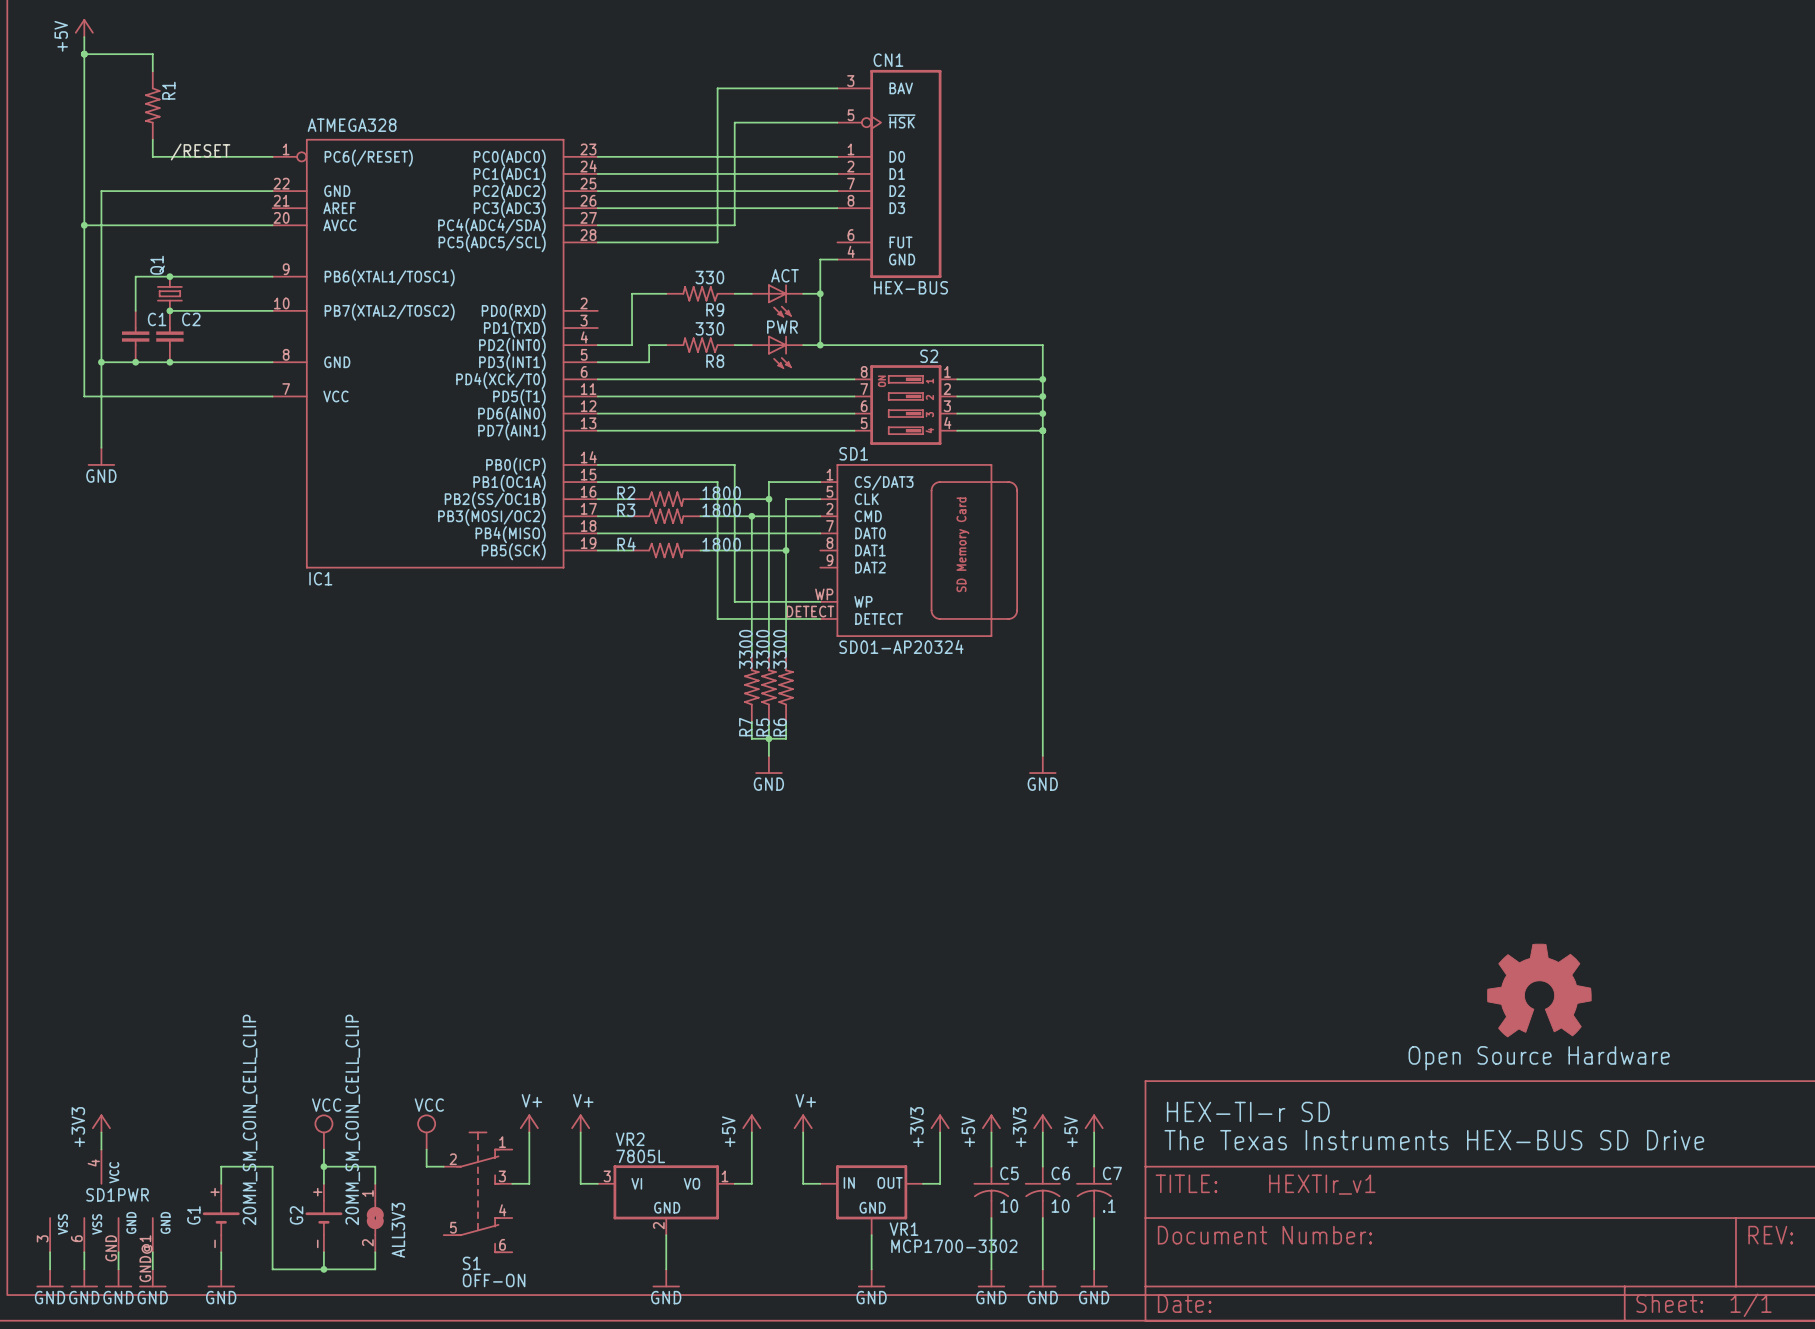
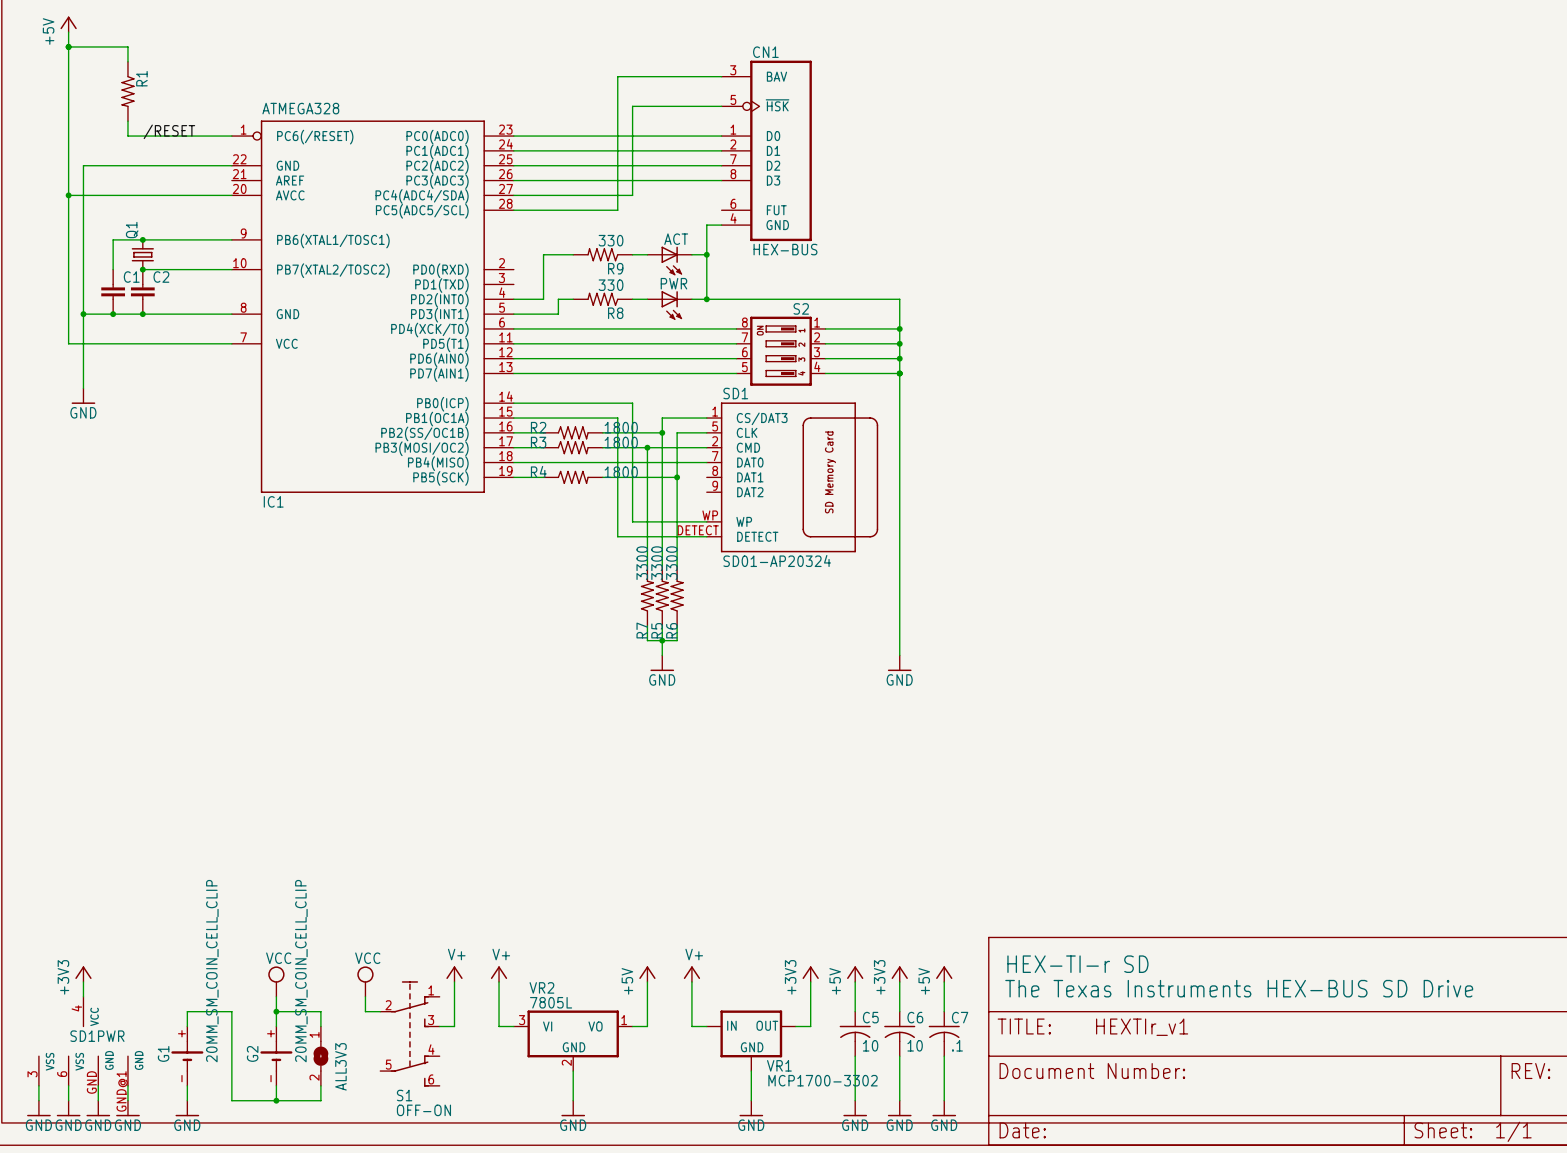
part: Open Source Hardware (1539, 990) -> none

